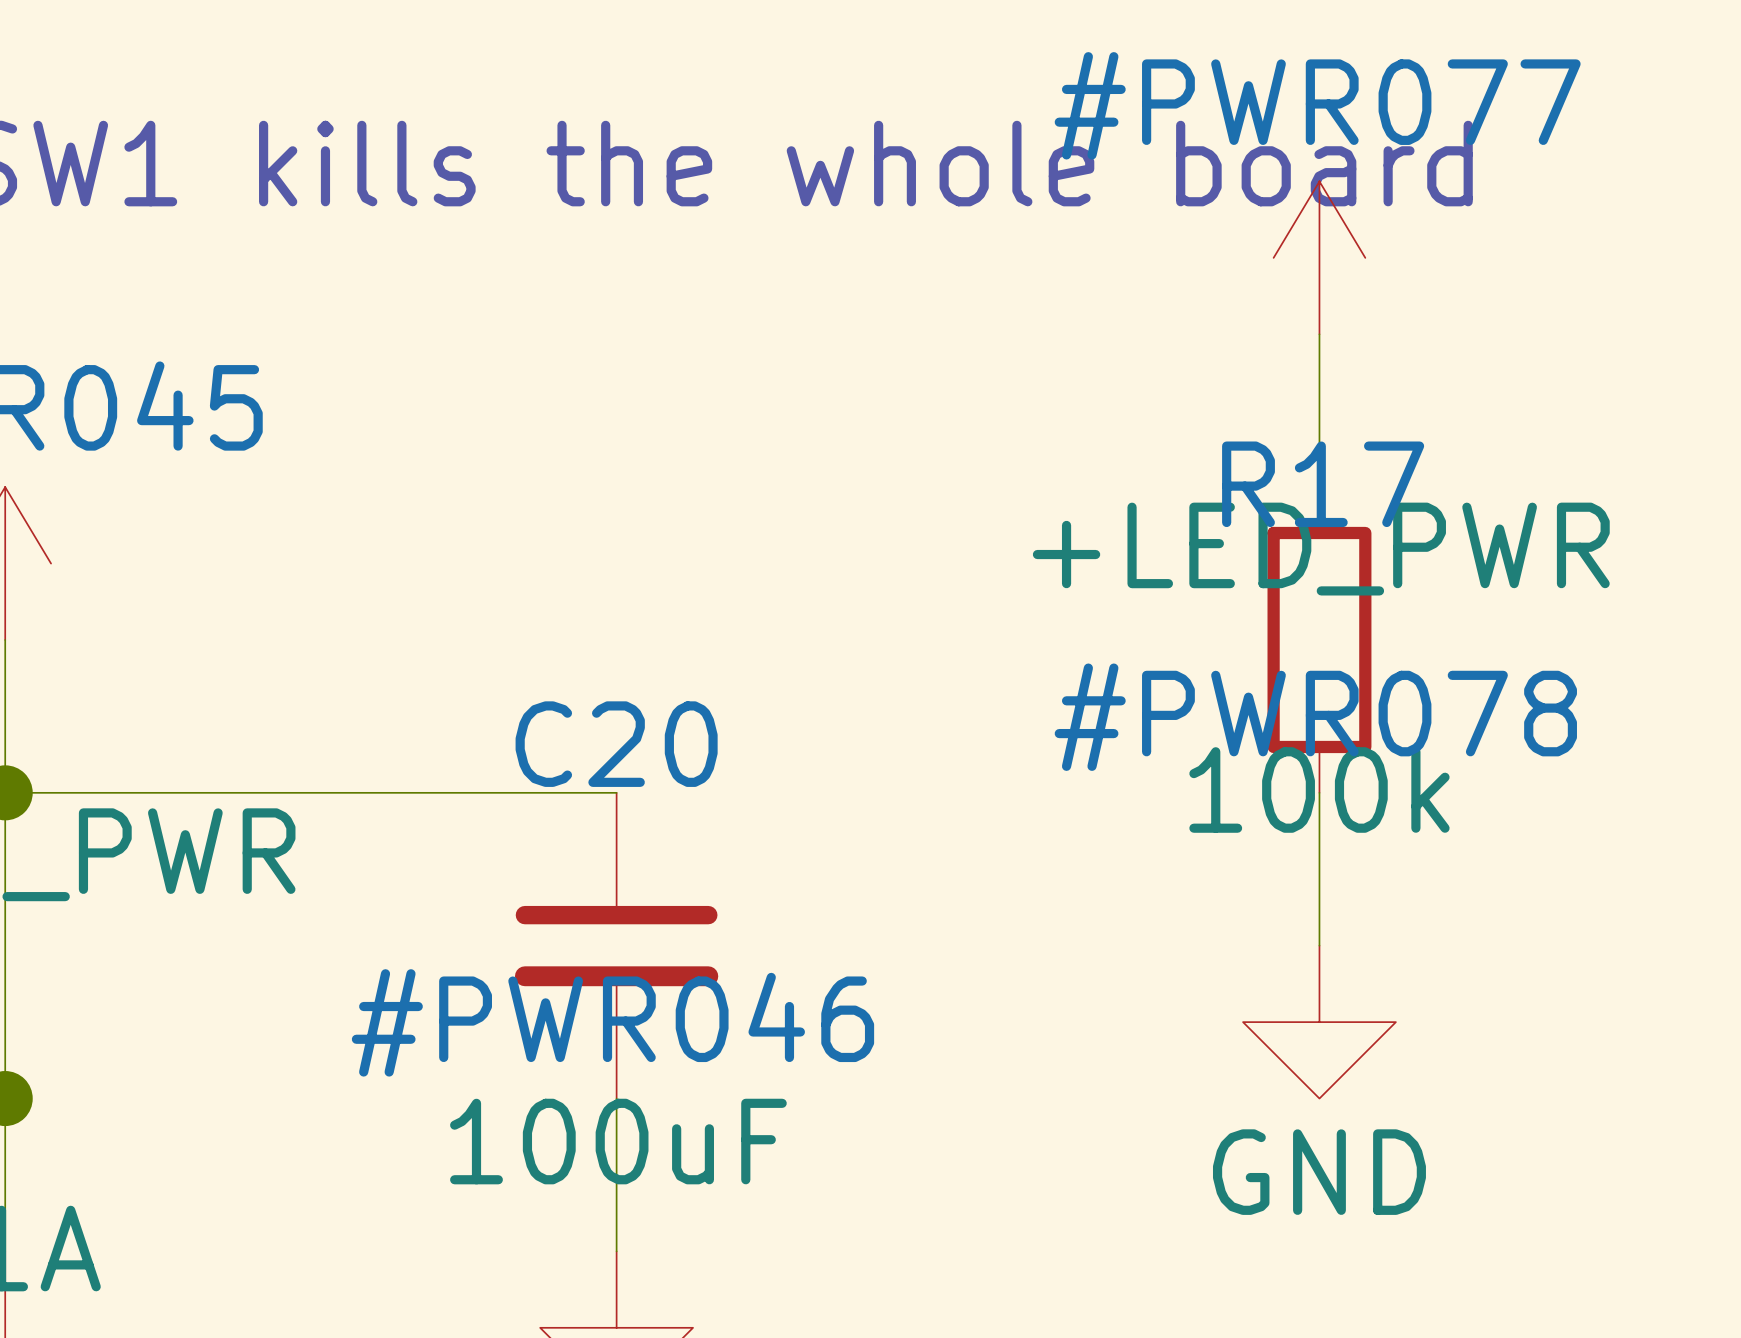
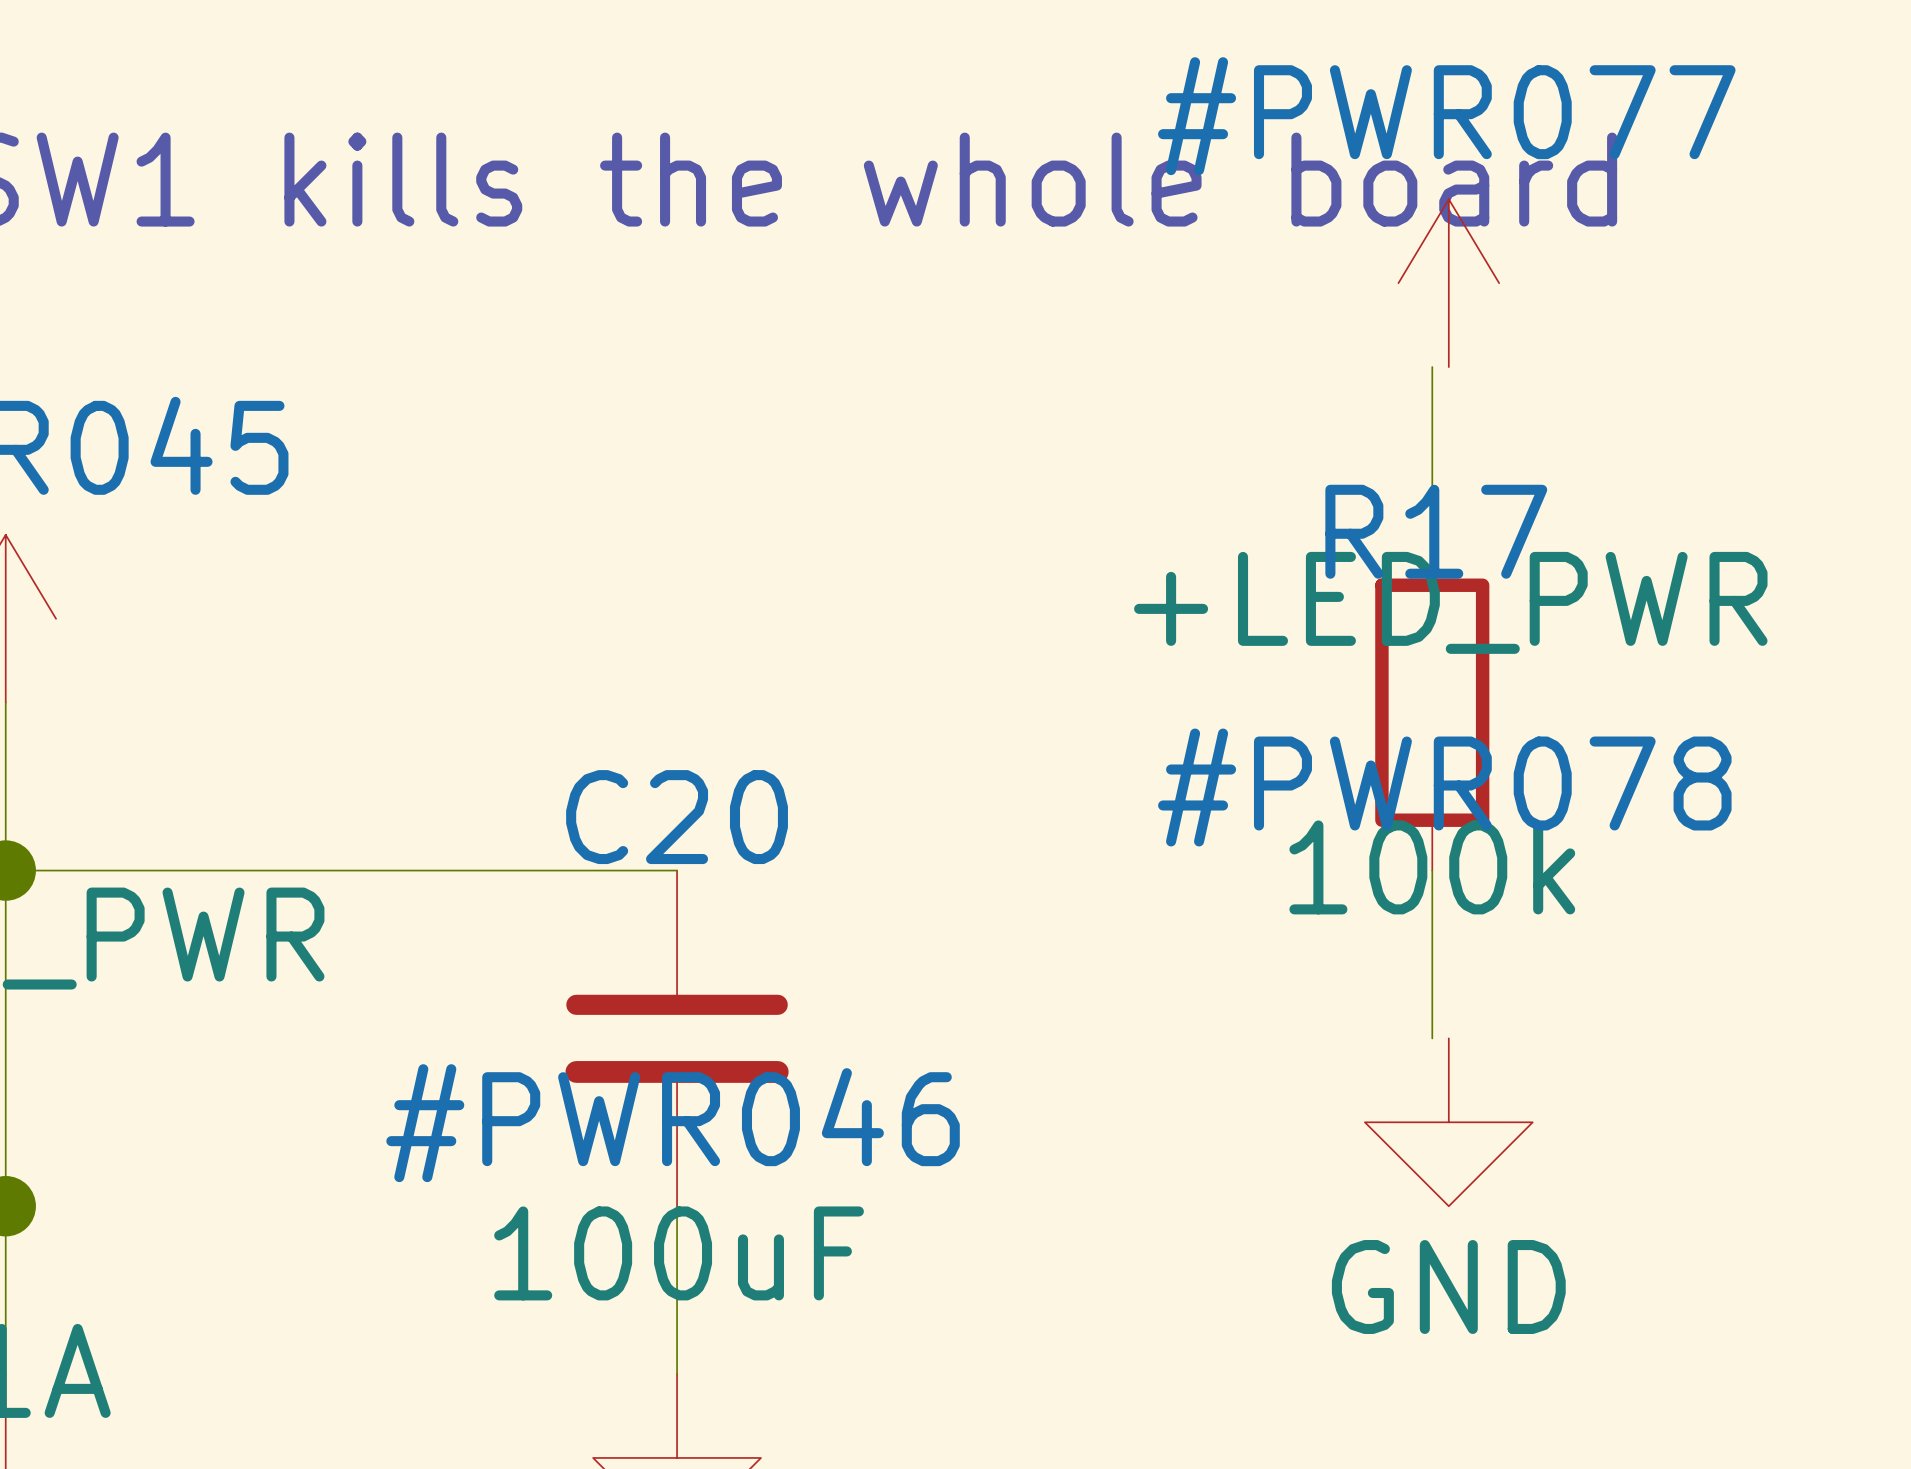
wire: (1319, 334) (1319, 487) -> (1432, 367) (1432, 534)
R17 position: (1319, 639) -> (1432, 702)
wire: (1319, 792) (1319, 945) -> (1432, 870) (1432, 1038)

